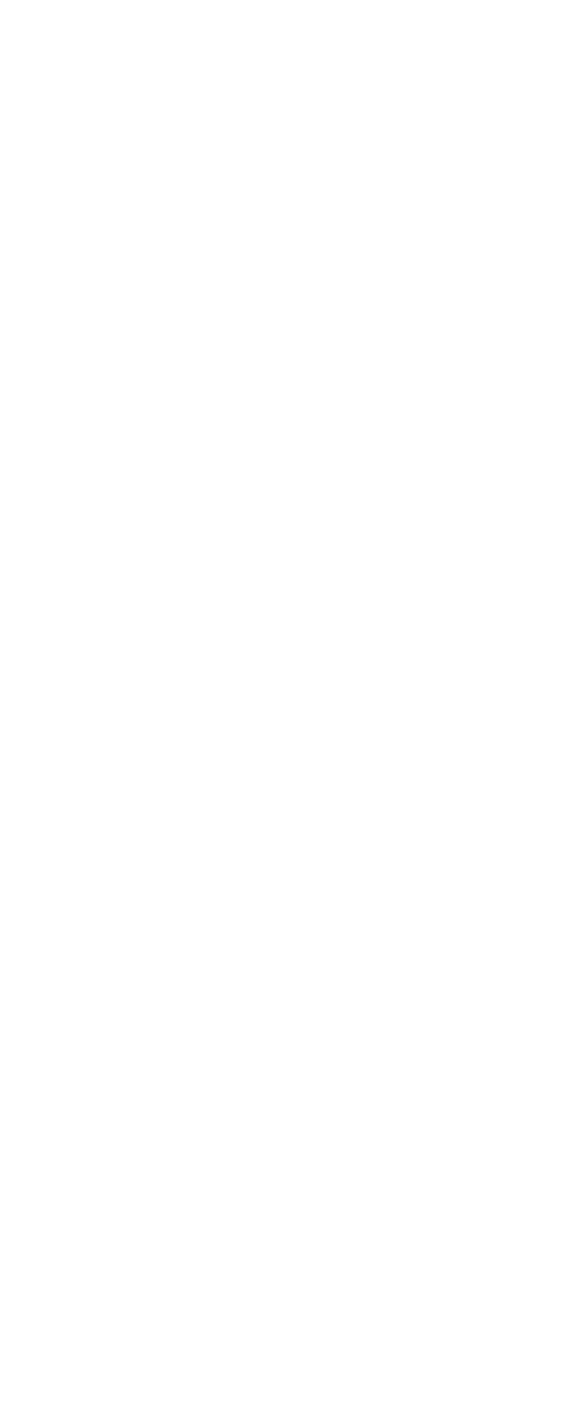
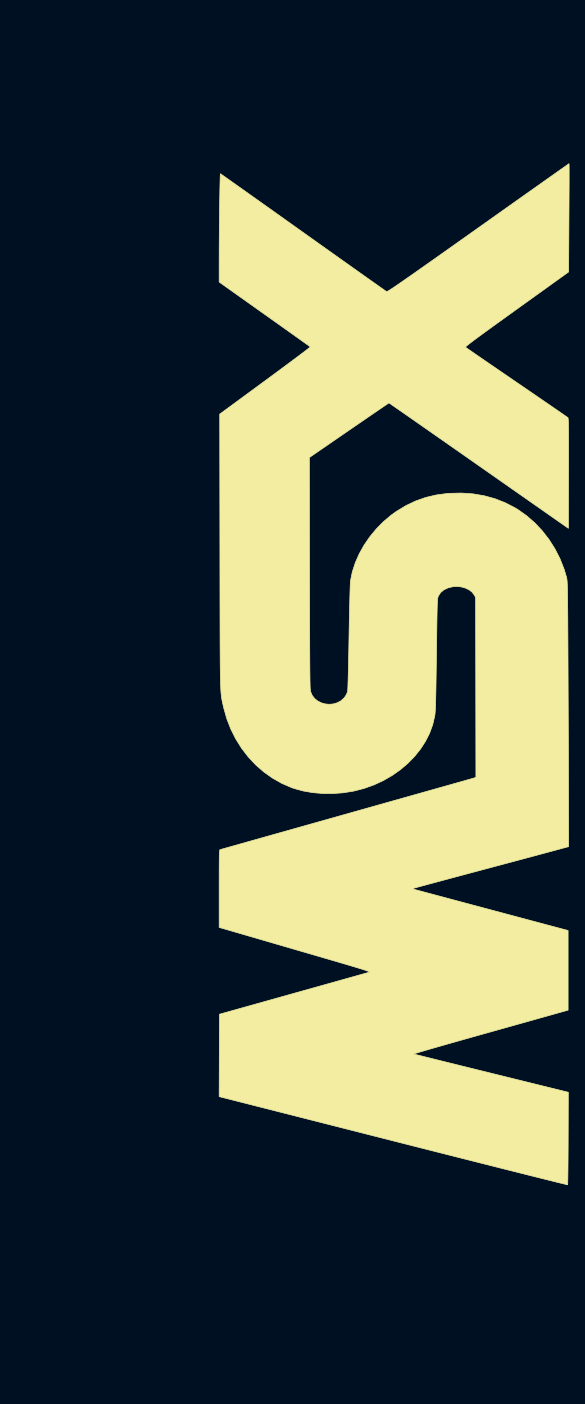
drawing: none -> [218, 163, 570, 1186]

